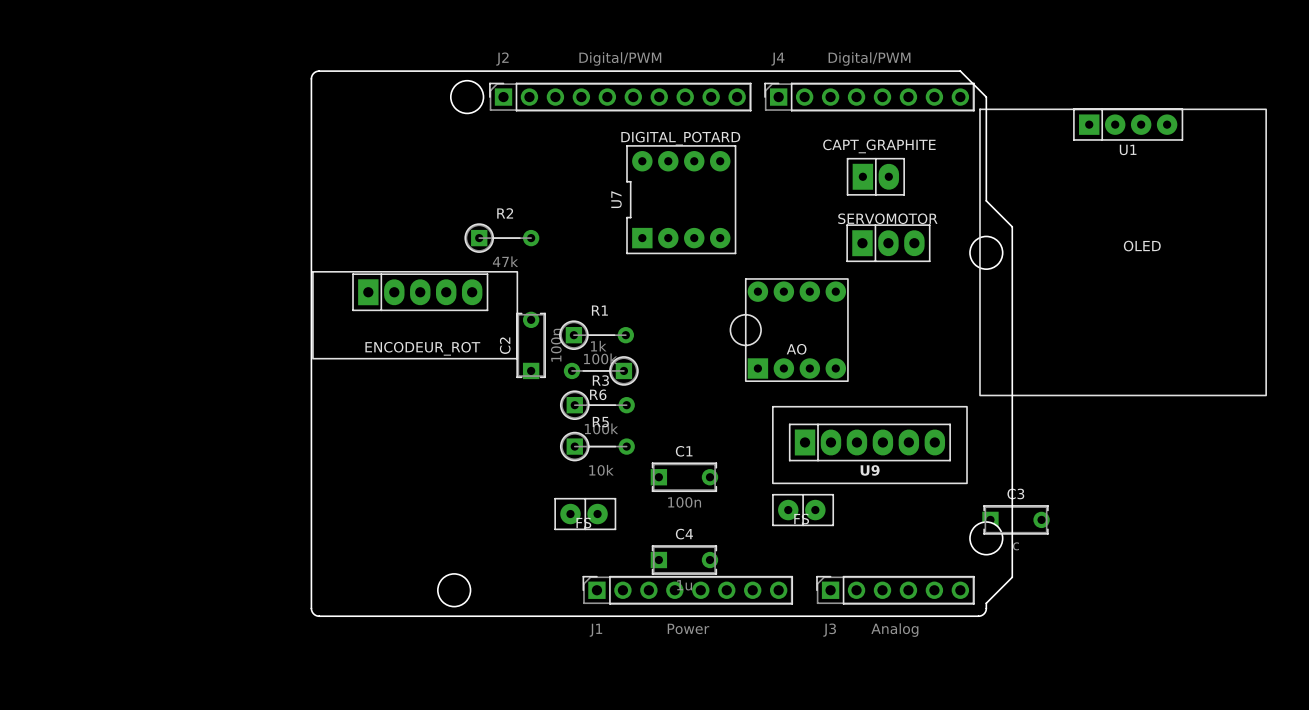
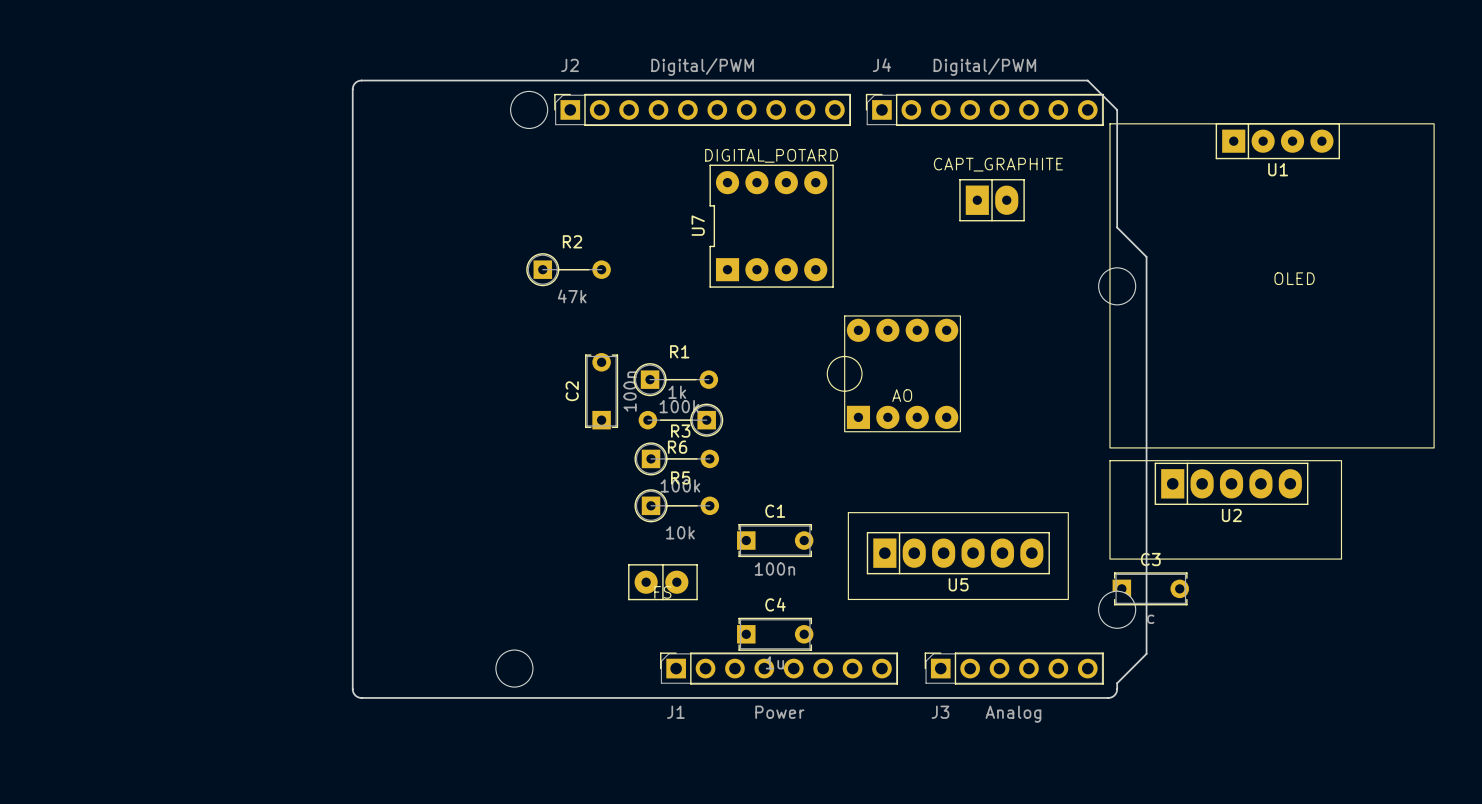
part: (888, 243) -> none
part: (415, 315) -> none
U9: (869, 445) -> none
U2: none -> (1225, 509)
U5: none -> (958, 556)
part: (803, 510) -> none

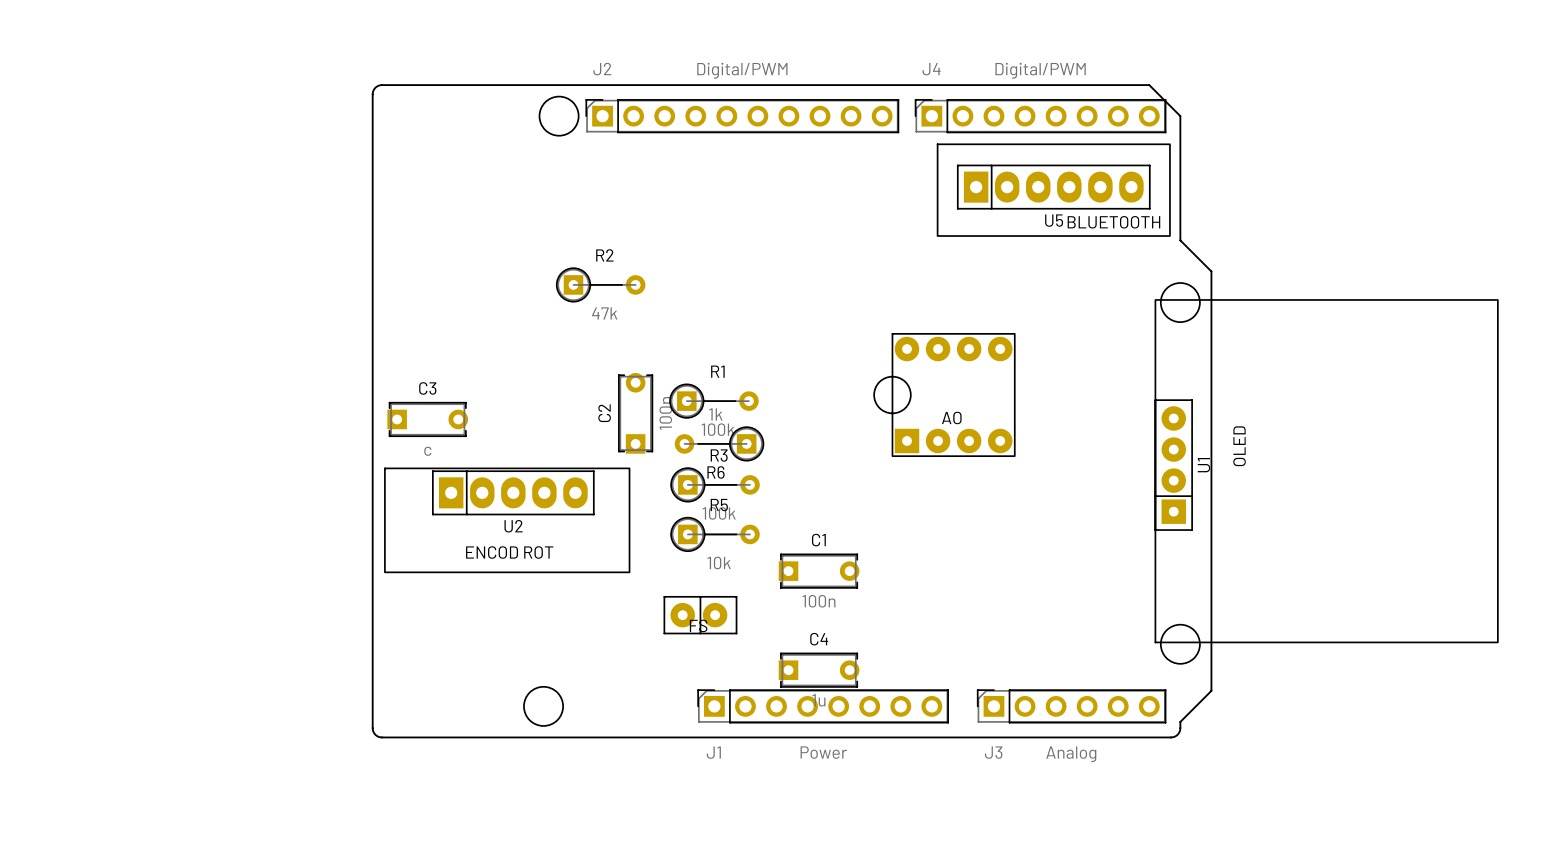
U1 footprint: [1109, 123, 1435, 449] -> [1154, 299, 1499, 644]
U1 name position: U1 (1278, 169) -> U1 (1203, 465)
part: (992, 200) -> none
U5 text: none -> BLUETOOTH (1113, 222)
U7: (771, 226) -> none
U2 position: (1225, 509) -> (507, 520)
U2 text: none -> ENCOD ROT (509, 552)
U5 position: (958, 556) -> (1053, 190)
C3 position: (1150, 588) -> (427, 419)

